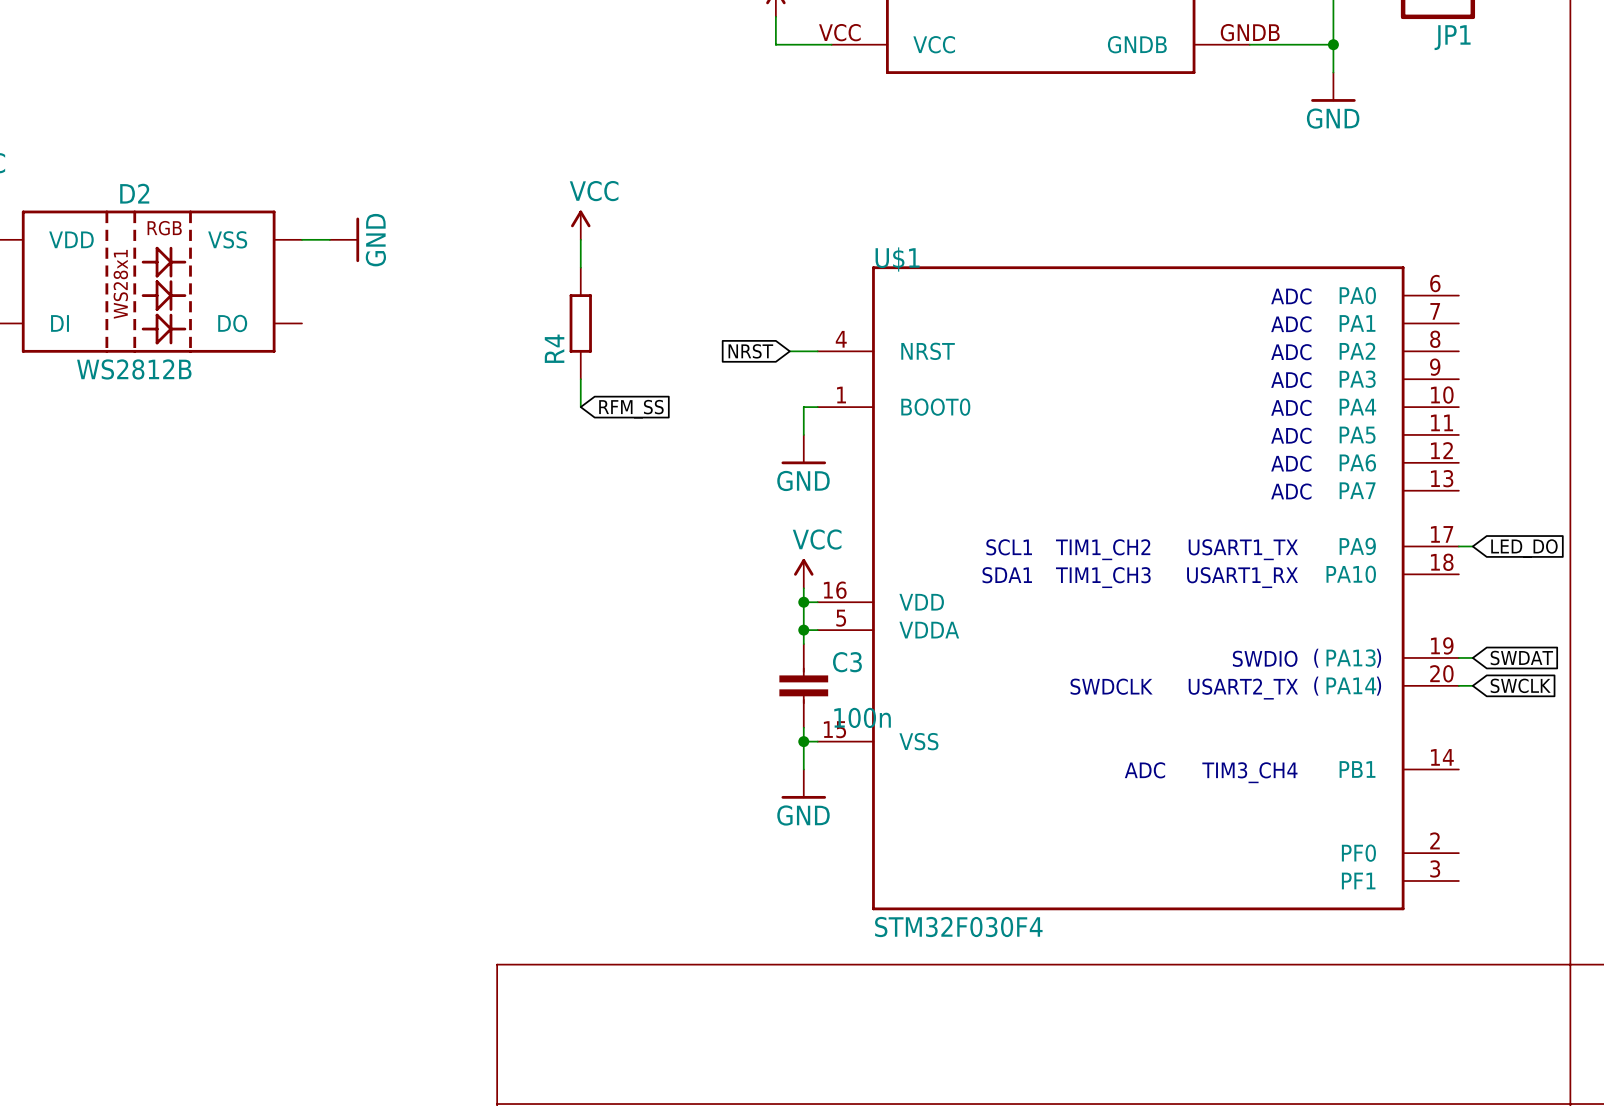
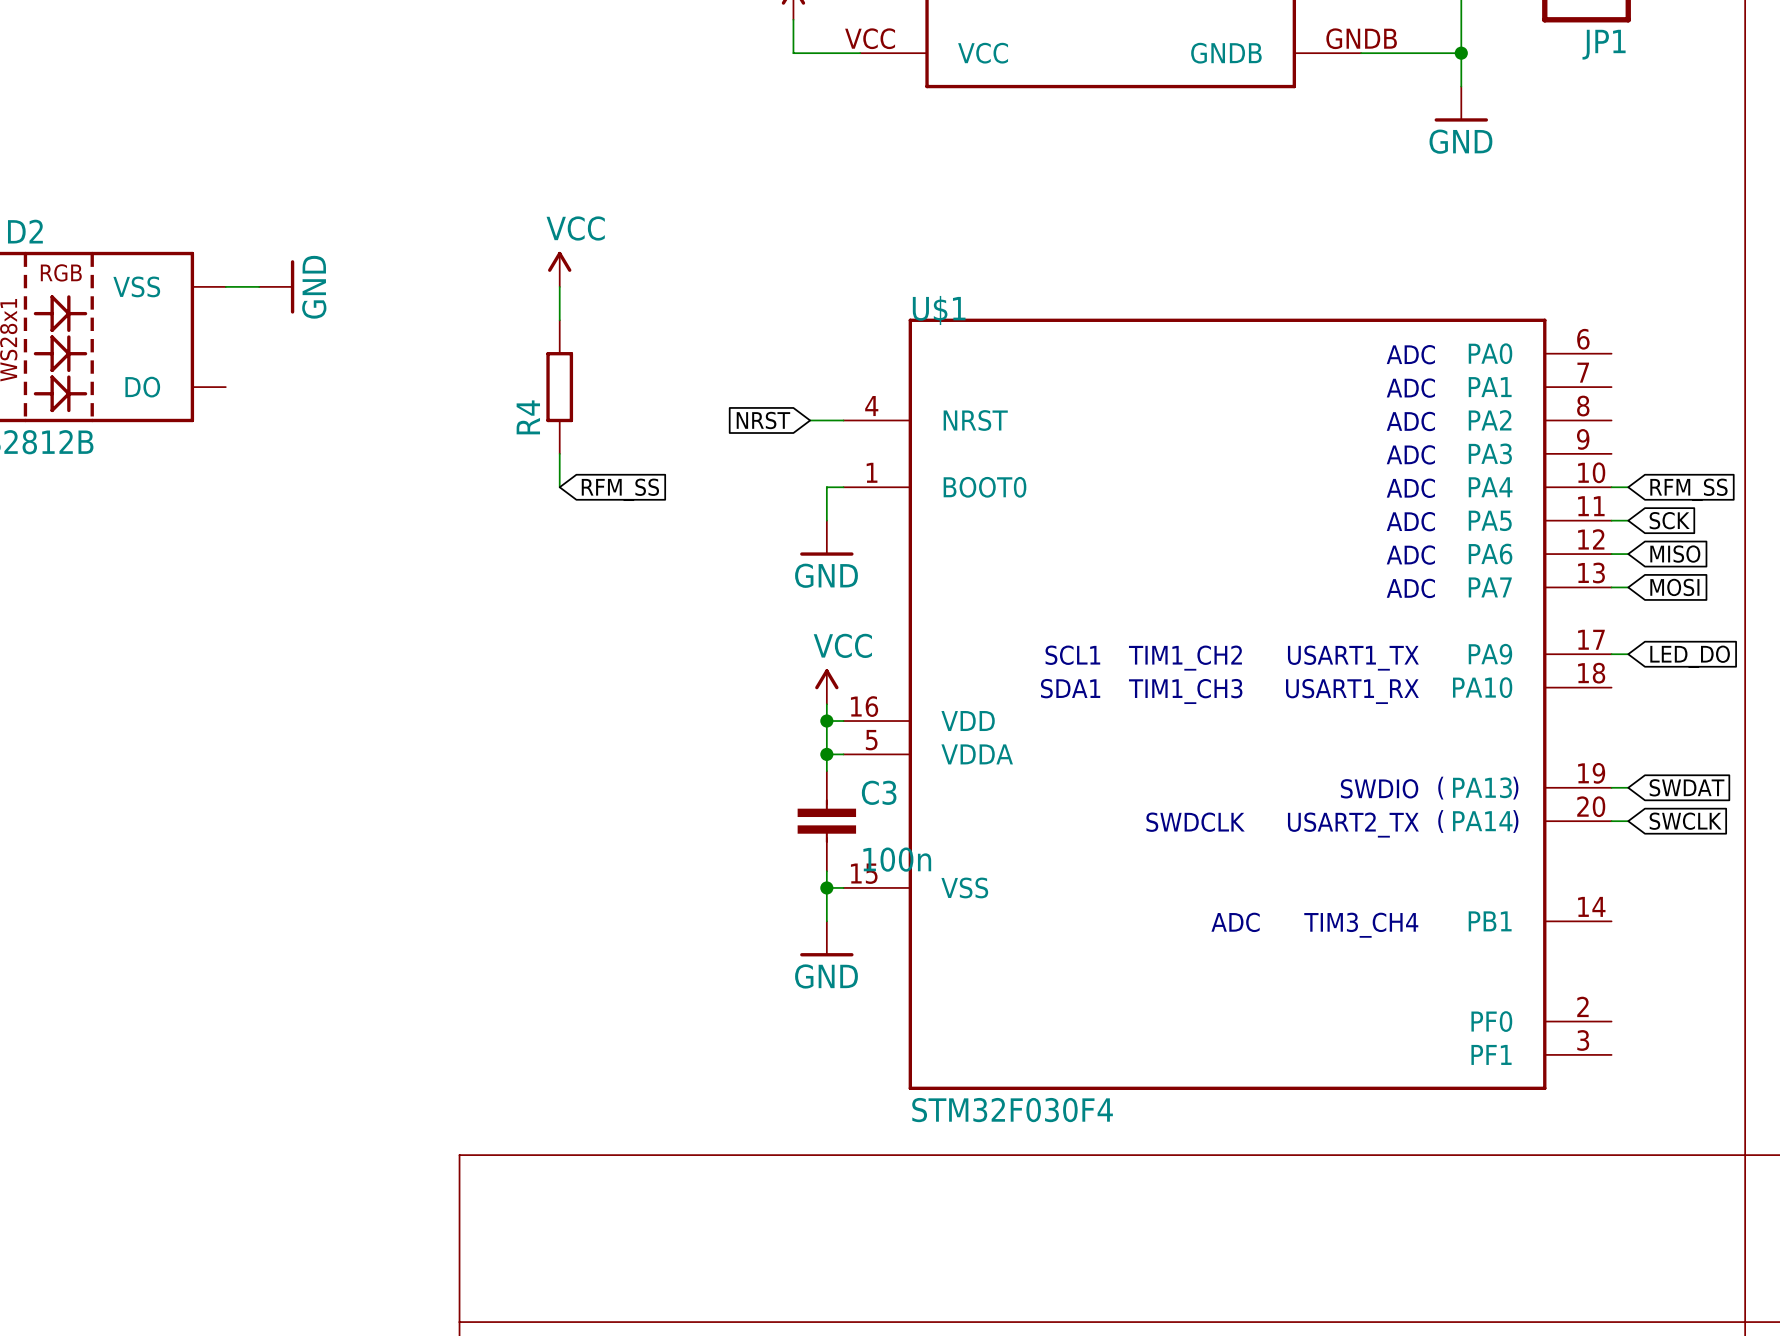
wire: none -> (1611, 487) (1628, 487)
global label: none -> RFM_SS (1688, 489)
wire: none -> (1611, 520) (1628, 520)
global label: none -> SCK (1669, 520)
wire: none -> (1611, 554) (1628, 554)
global label: none -> MISO (1675, 554)
wire: none -> (1611, 587) (1628, 587)
global label: none -> MOSI (1674, 587)

